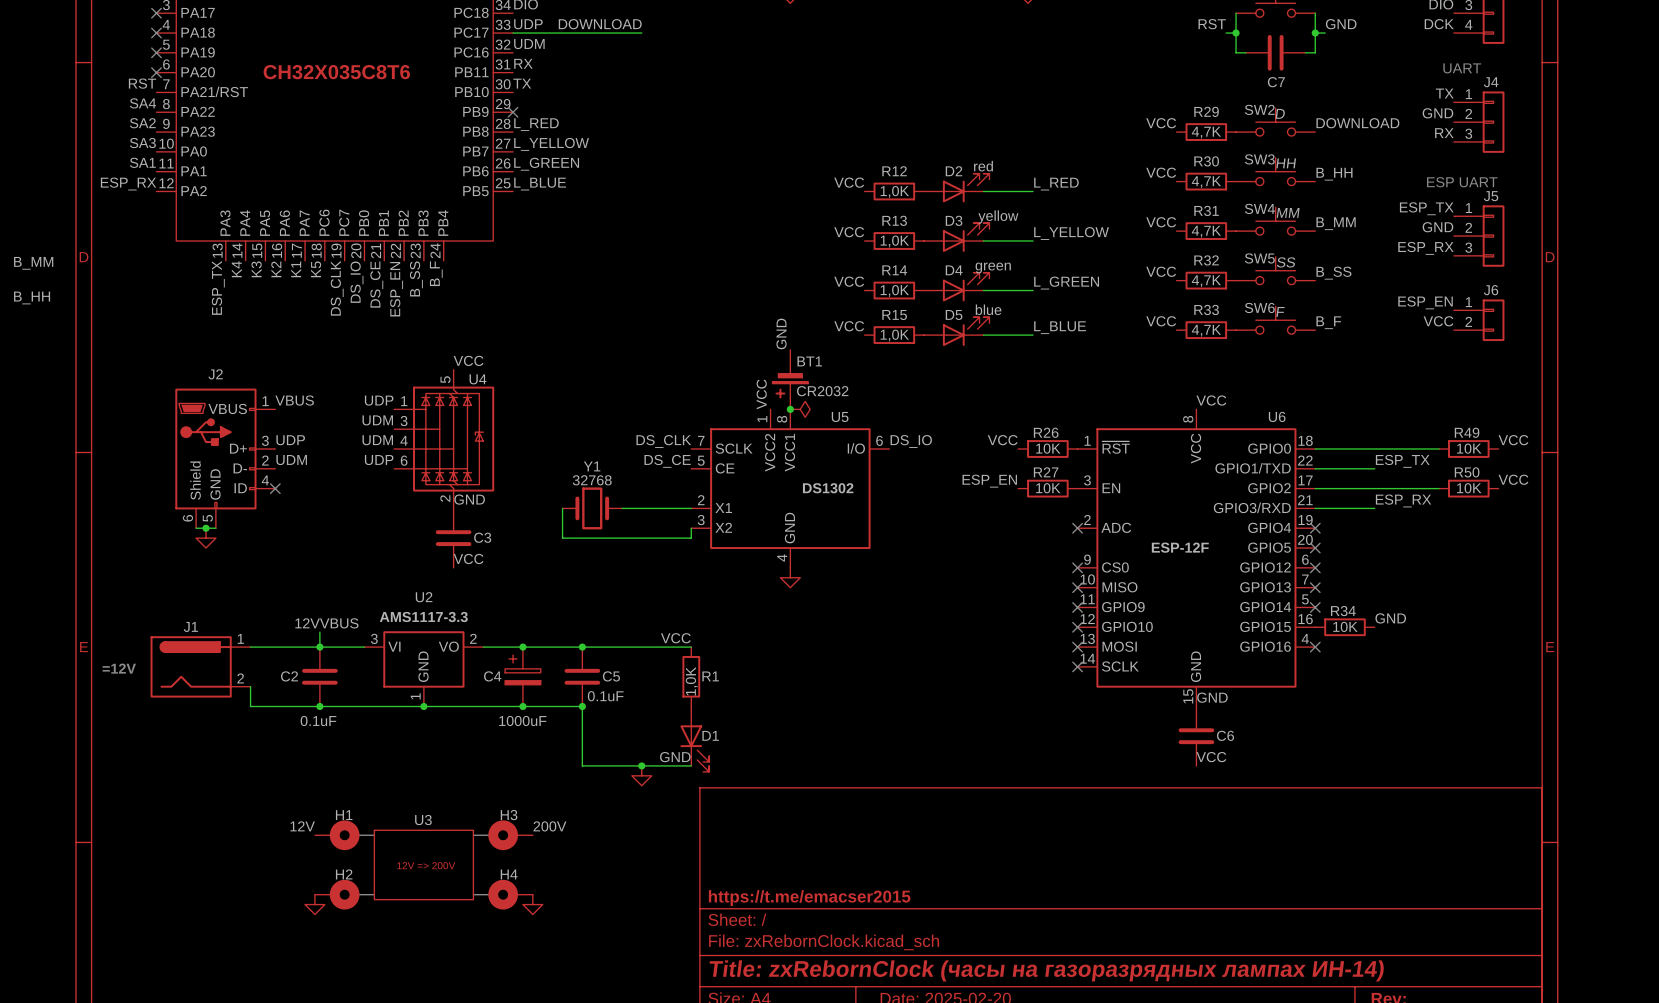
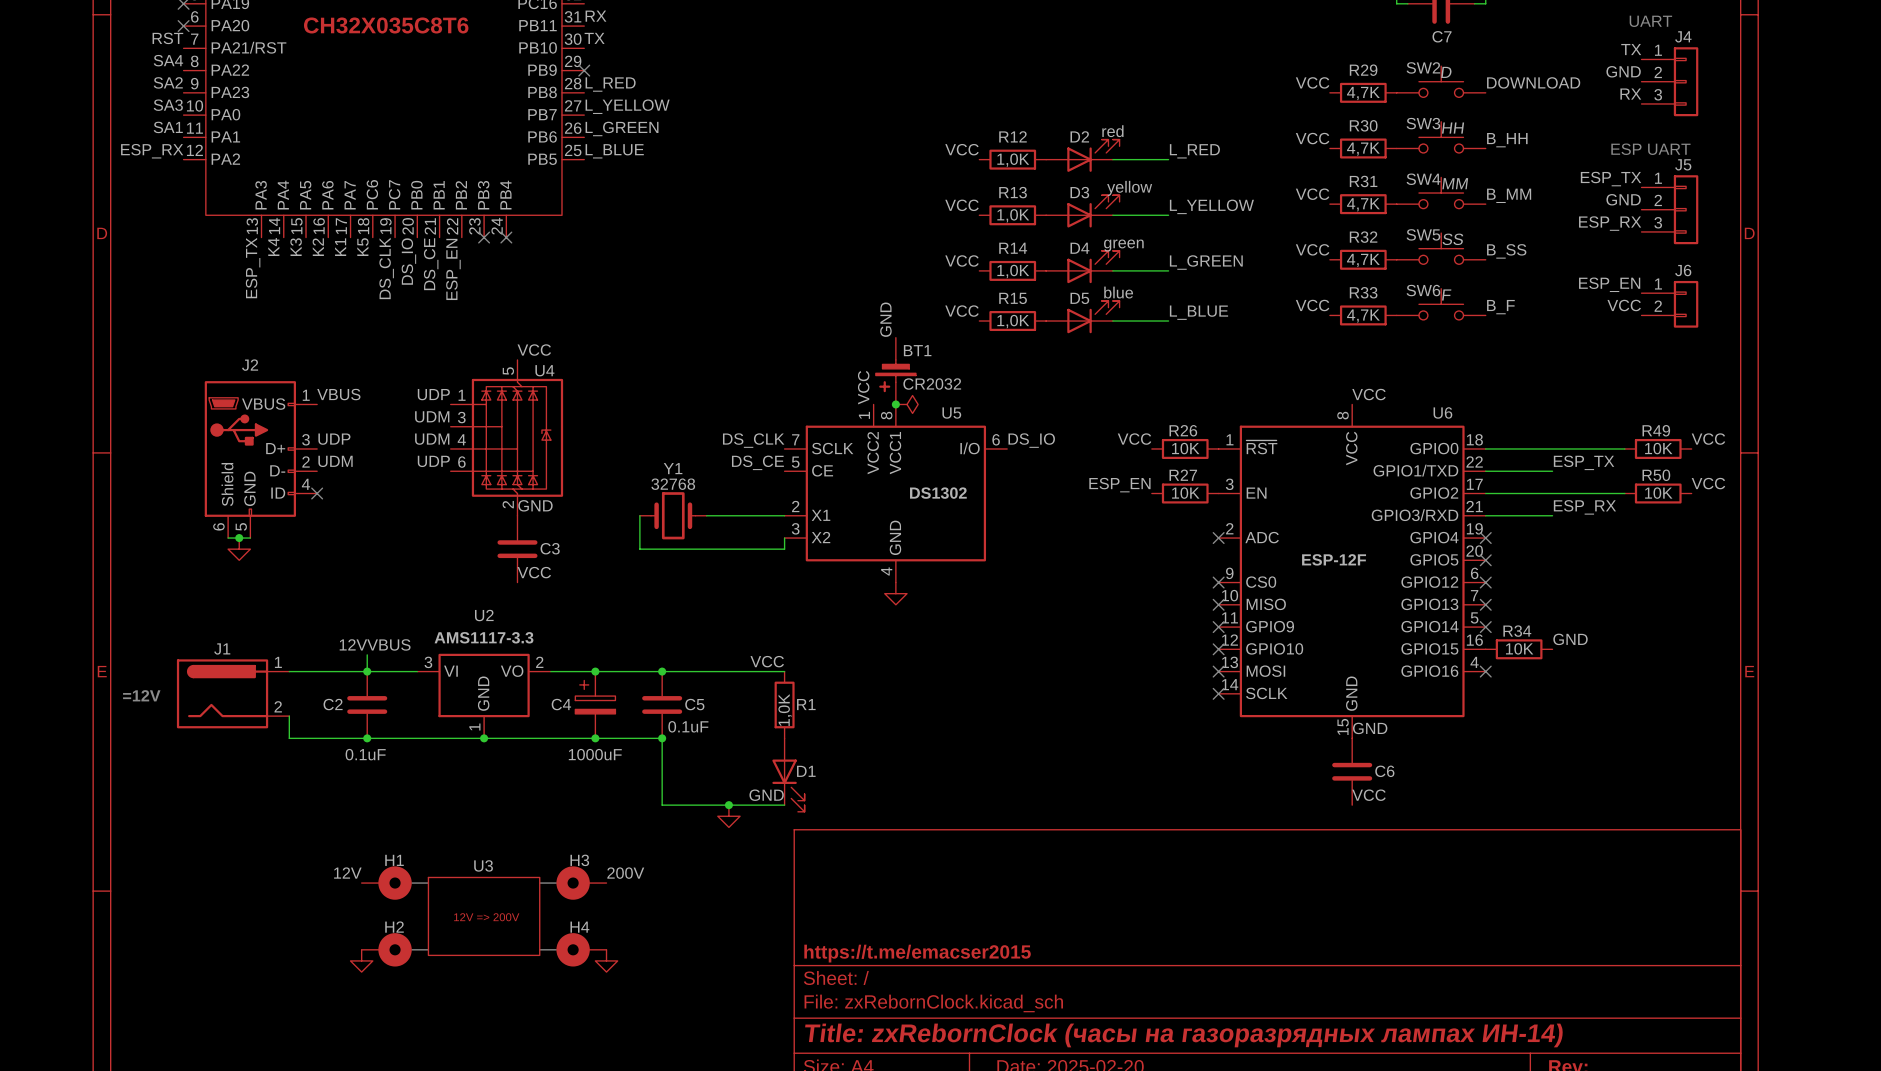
no-connect mark: none -> (484, 237)
no-connect mark: none -> (506, 237)
label: B_MM (33, 263) -> none
label: B_F (436, 273) -> none
label: B_SS (416, 278) -> none
label: B_HH (32, 297) -> none

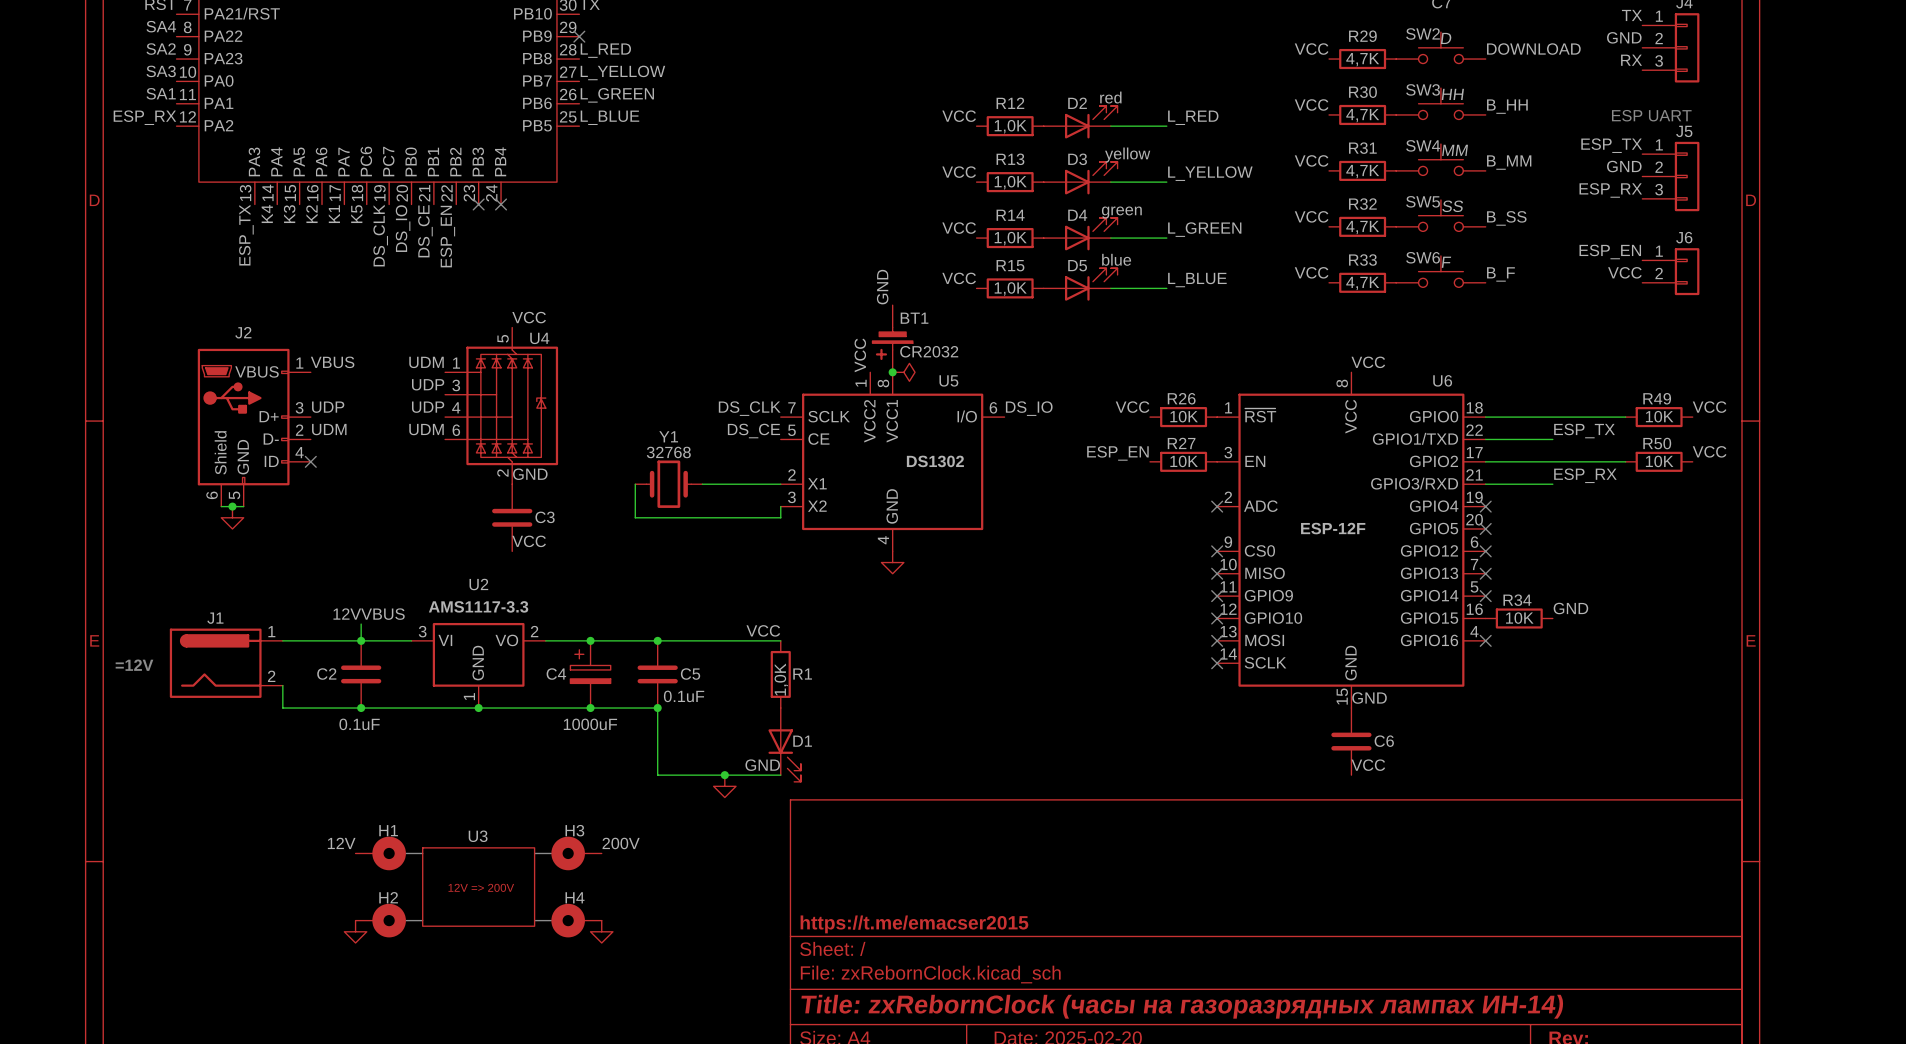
label: UDP (433, 394) -> UDM (426, 362)
label: UDM (432, 416) -> UDP (428, 384)
label: UDM (432, 439) -> UDP (428, 407)
label: UDP (433, 461) -> UDM (426, 429)

